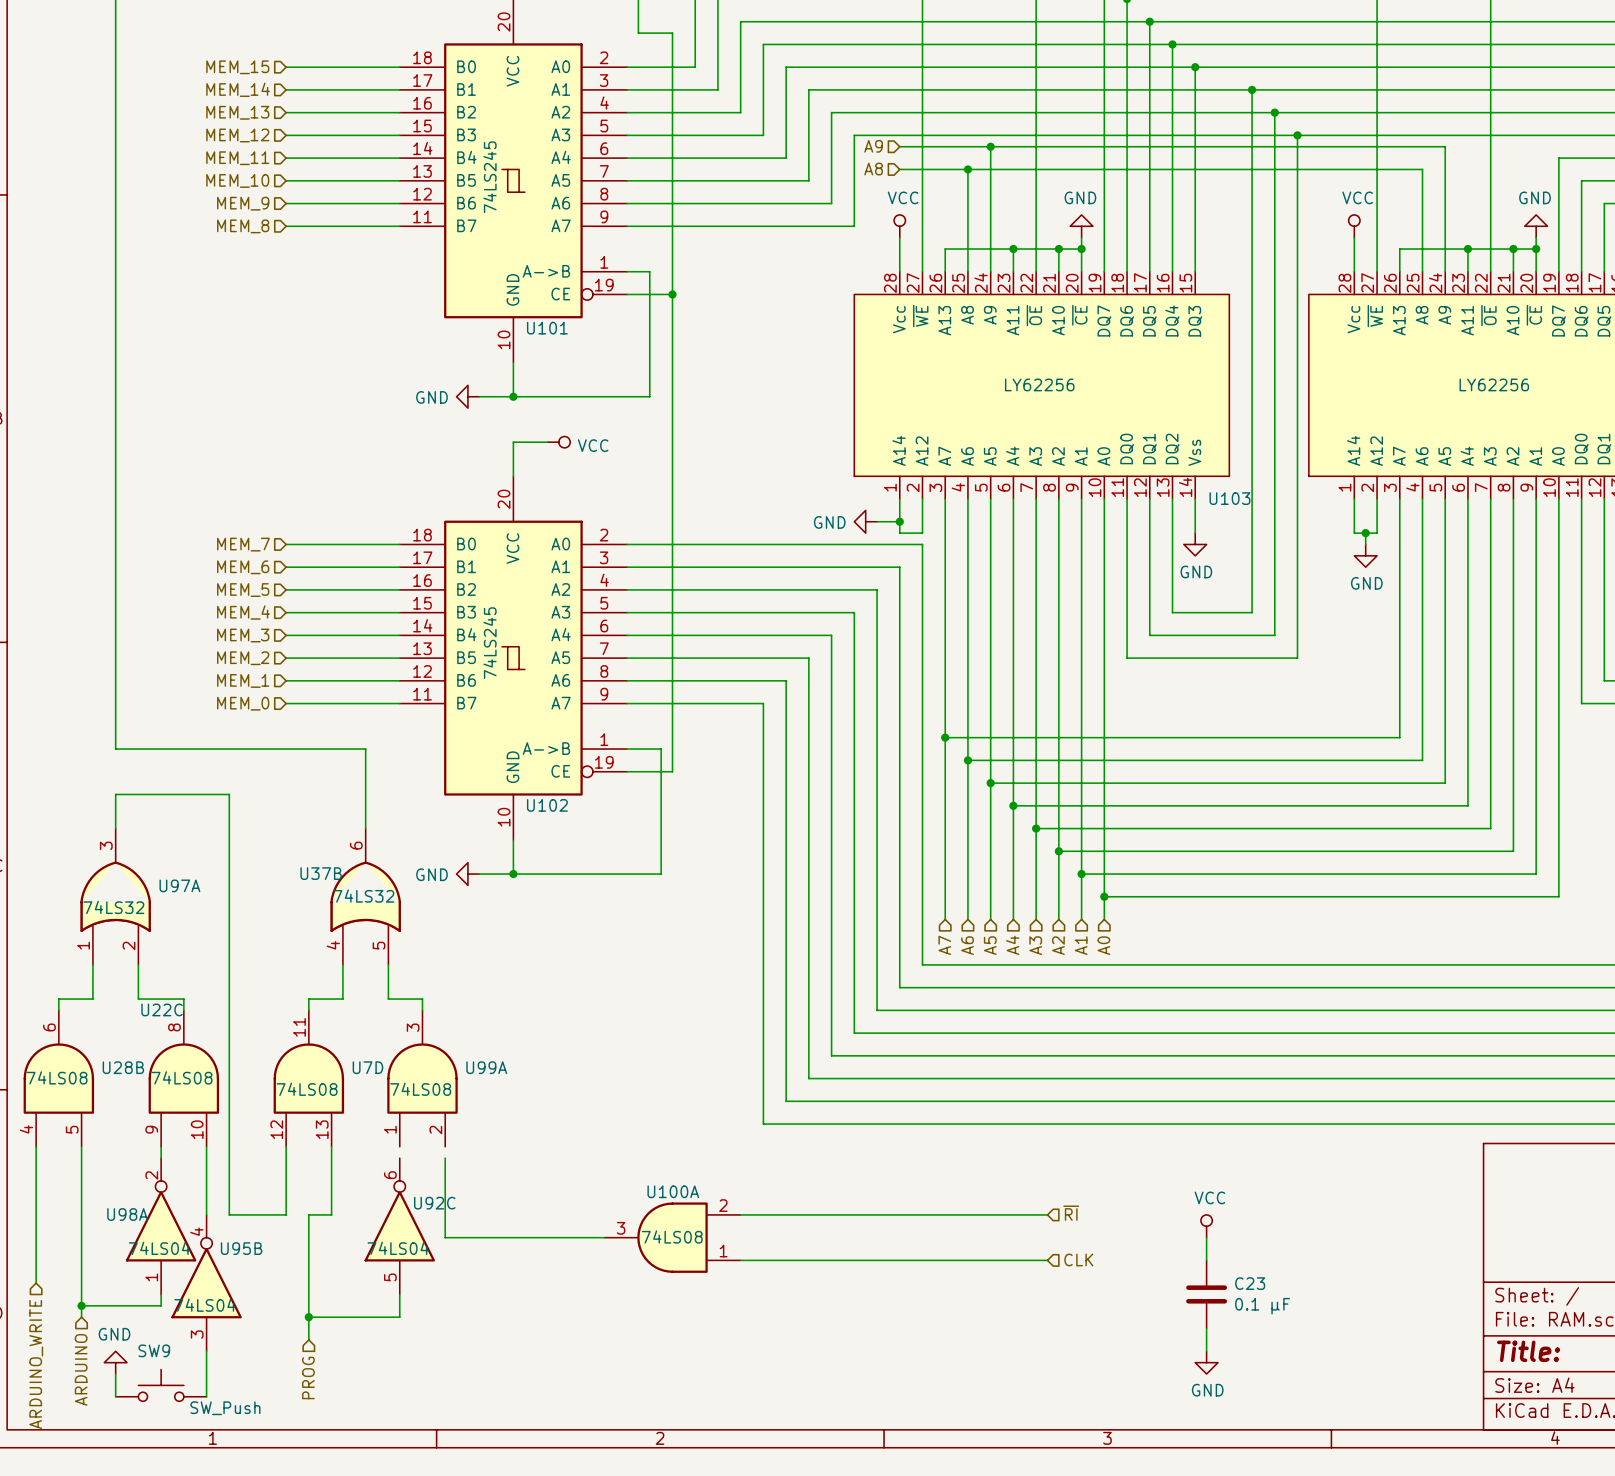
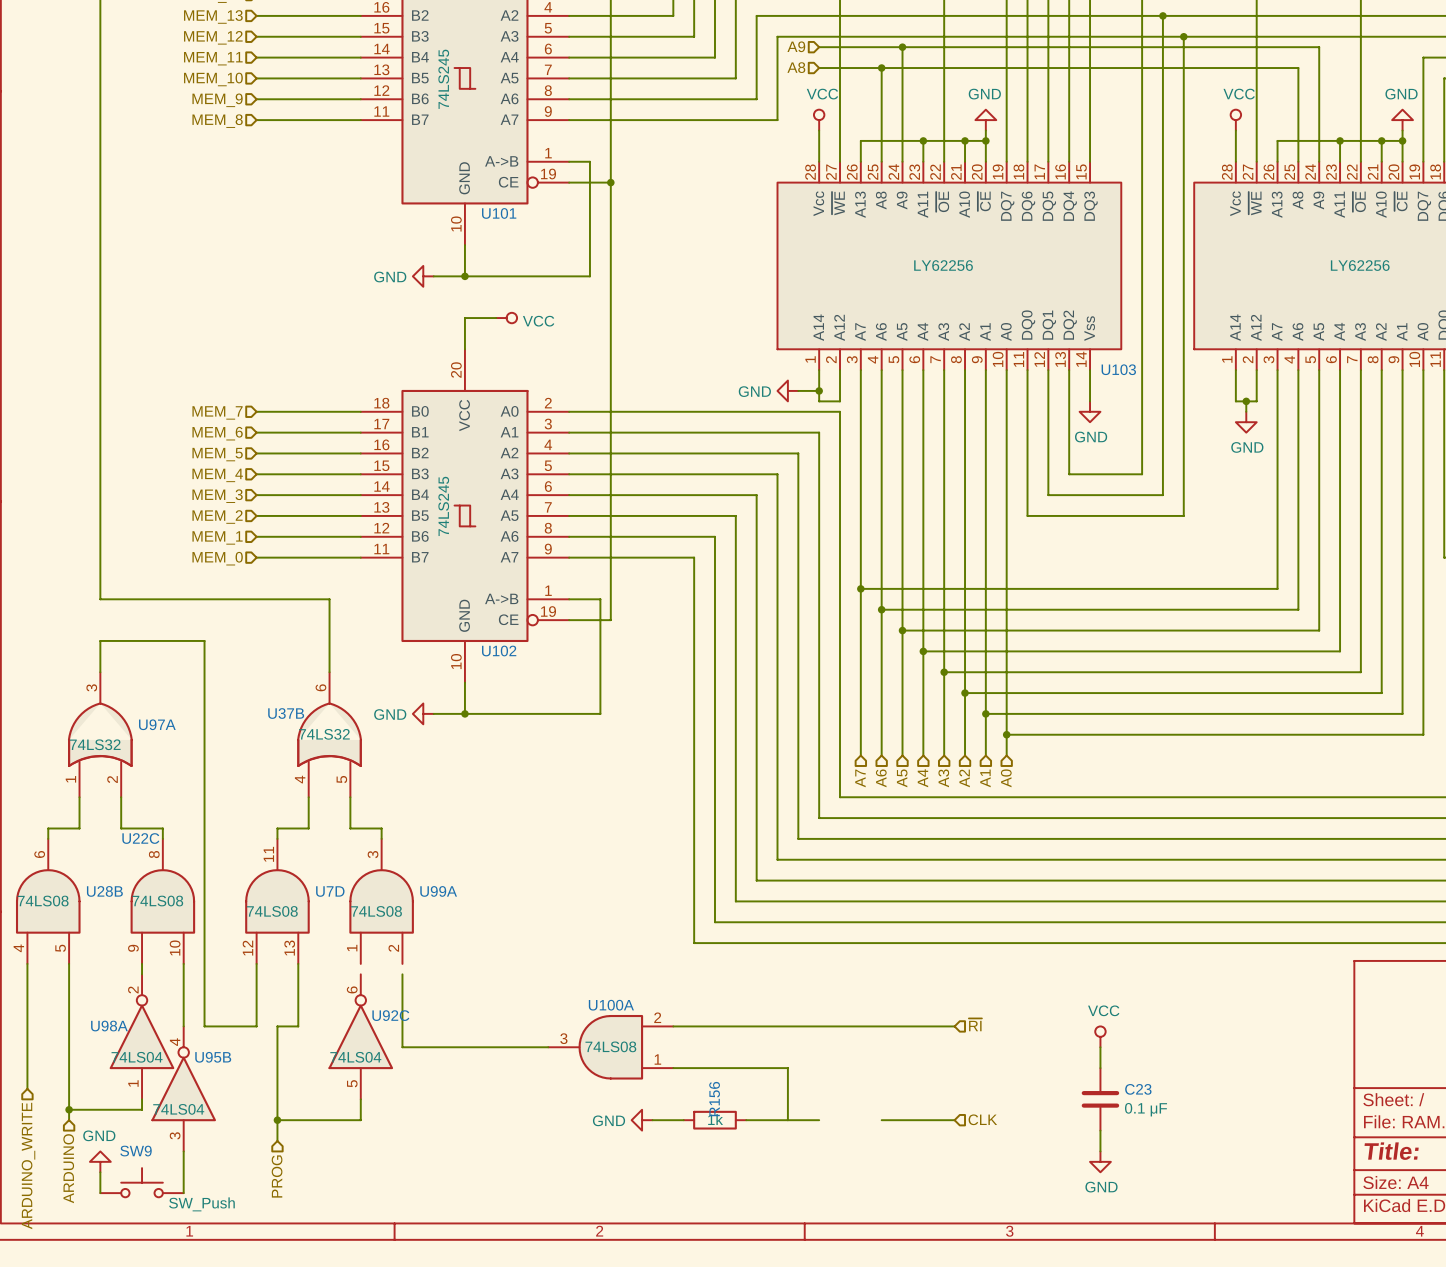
hierarchical label position: CLK (1078, 1259) -> CLK (982, 1119)
wire: (865, 1260) (1047, 1260) -> (787, 1068) (787, 1120)
power symbol: none -> GND (642, 1120)
wire: none -> (652, 1120) (683, 1120)
R156: none -> 1k (714, 1120)
wire: none -> (746, 1120) (819, 1120)
wire: none -> (881, 1120) (954, 1120)

